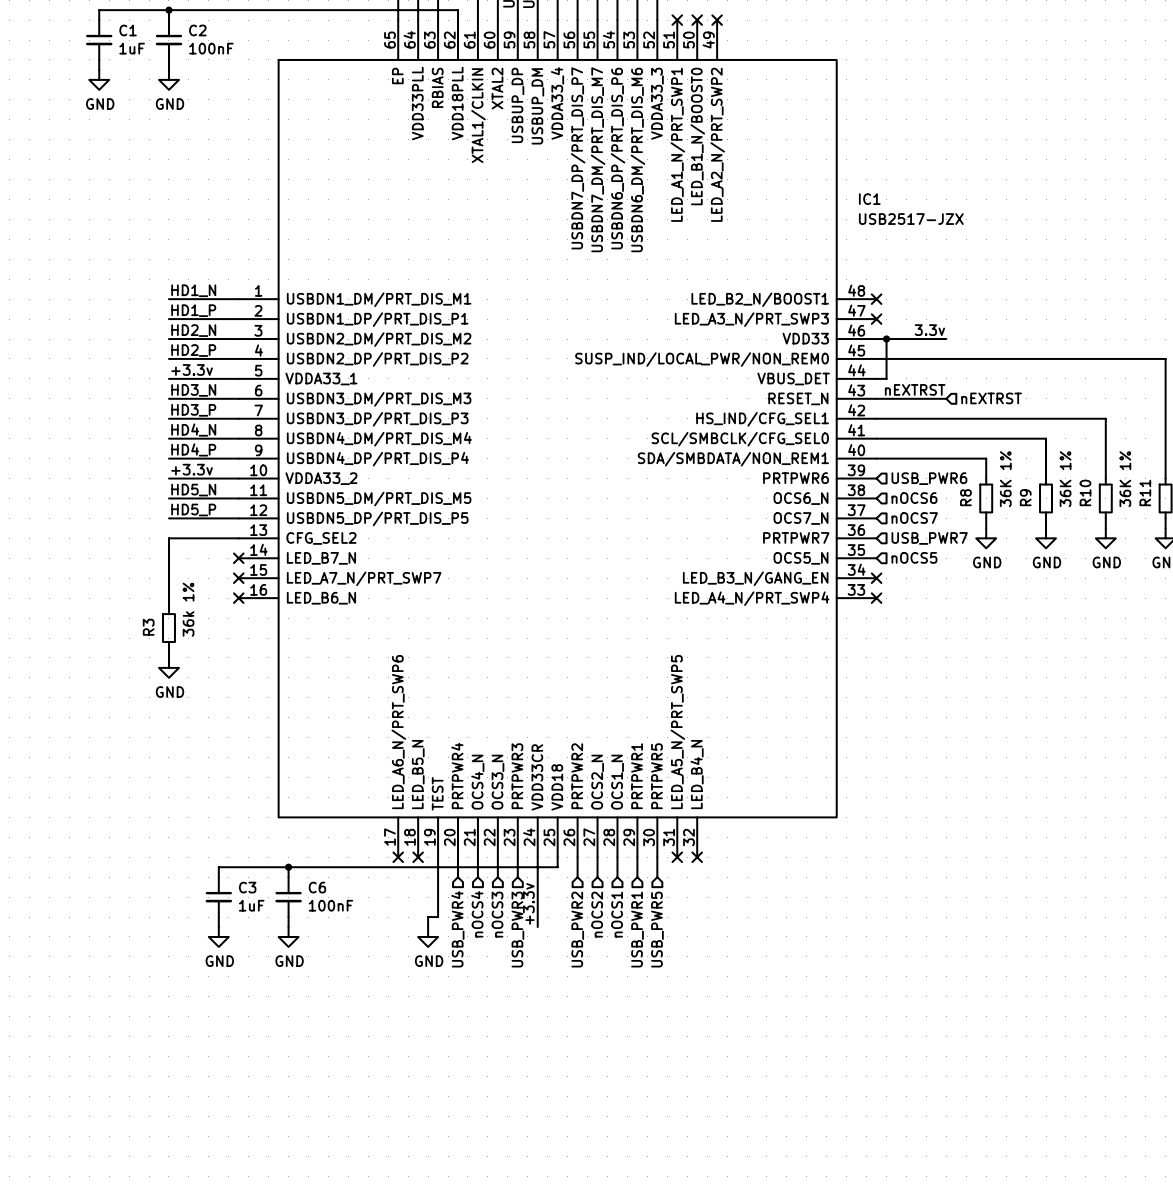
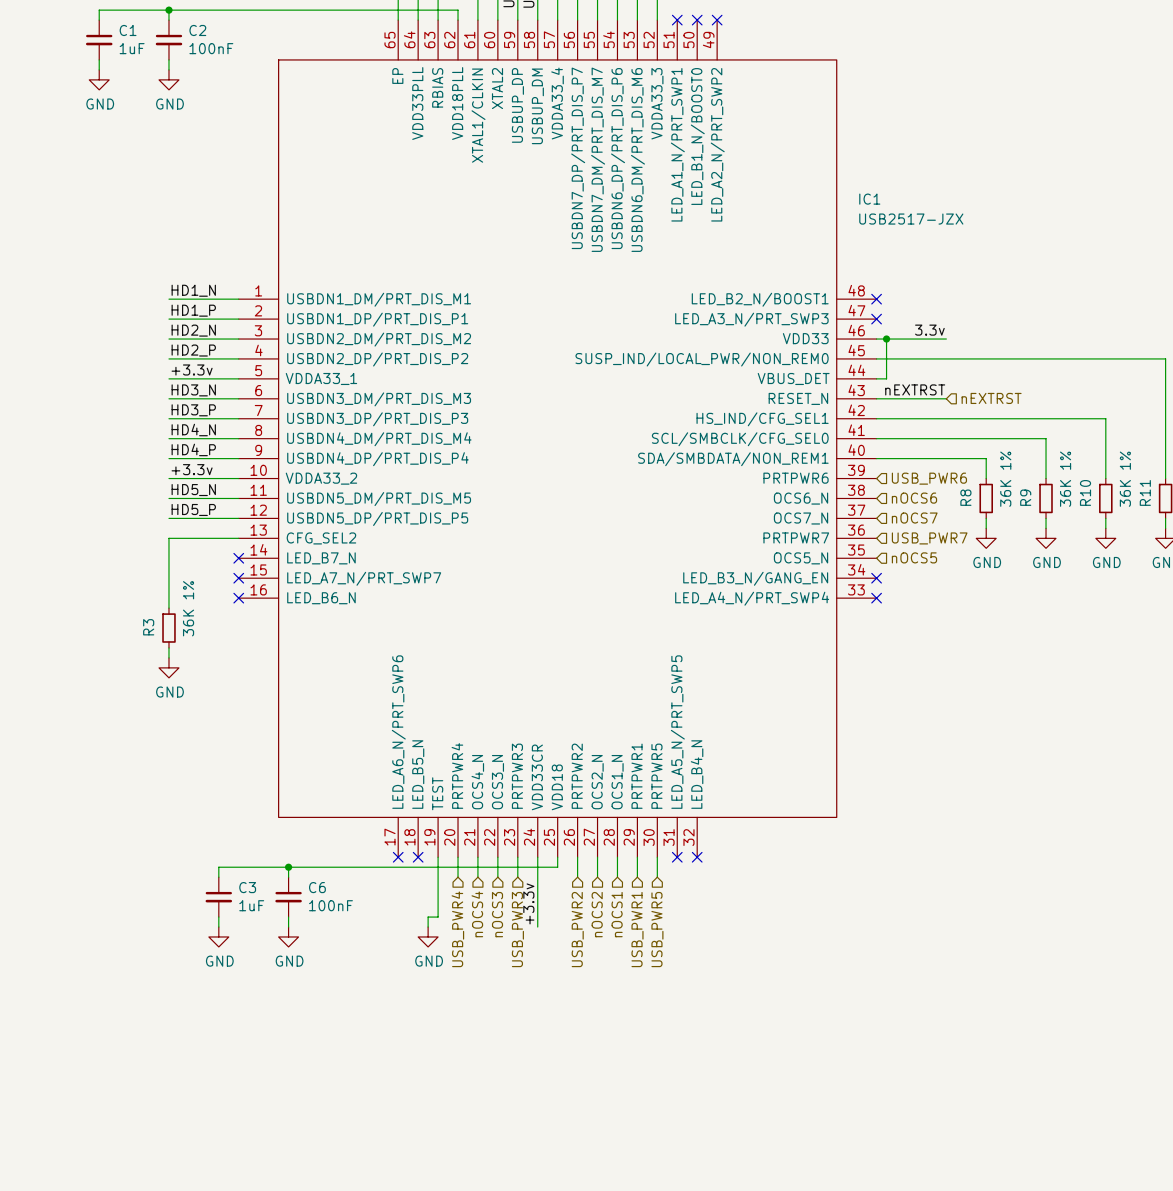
R3 value: 36k 1% (188, 609) -> 36K 1% (188, 608)

